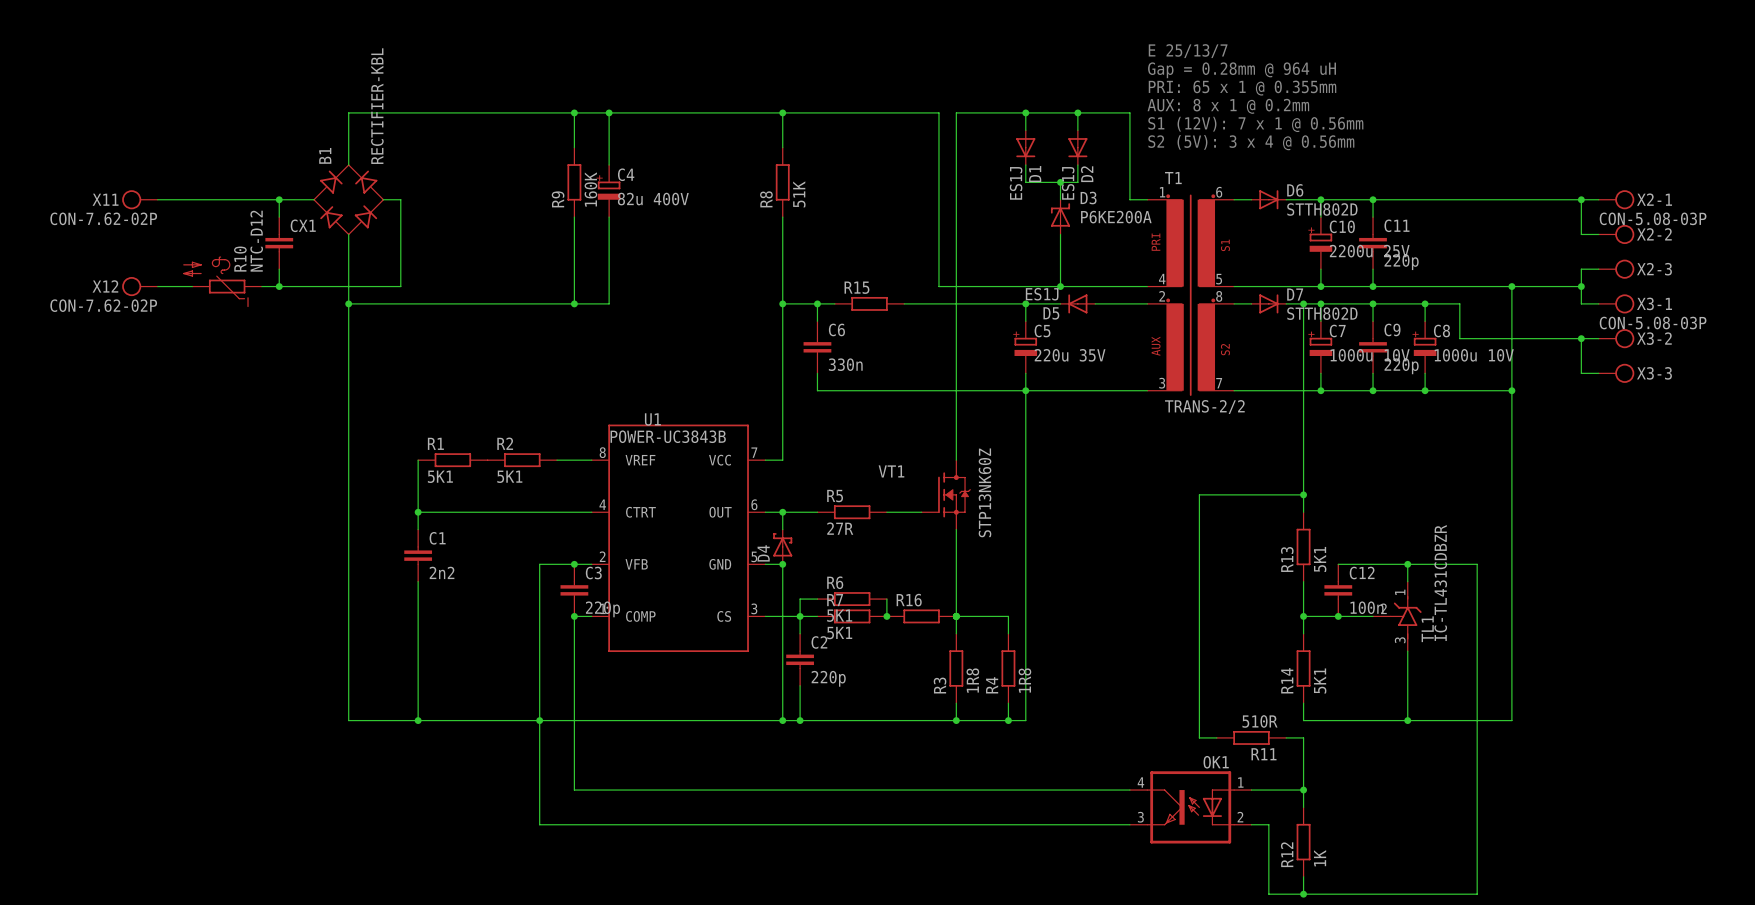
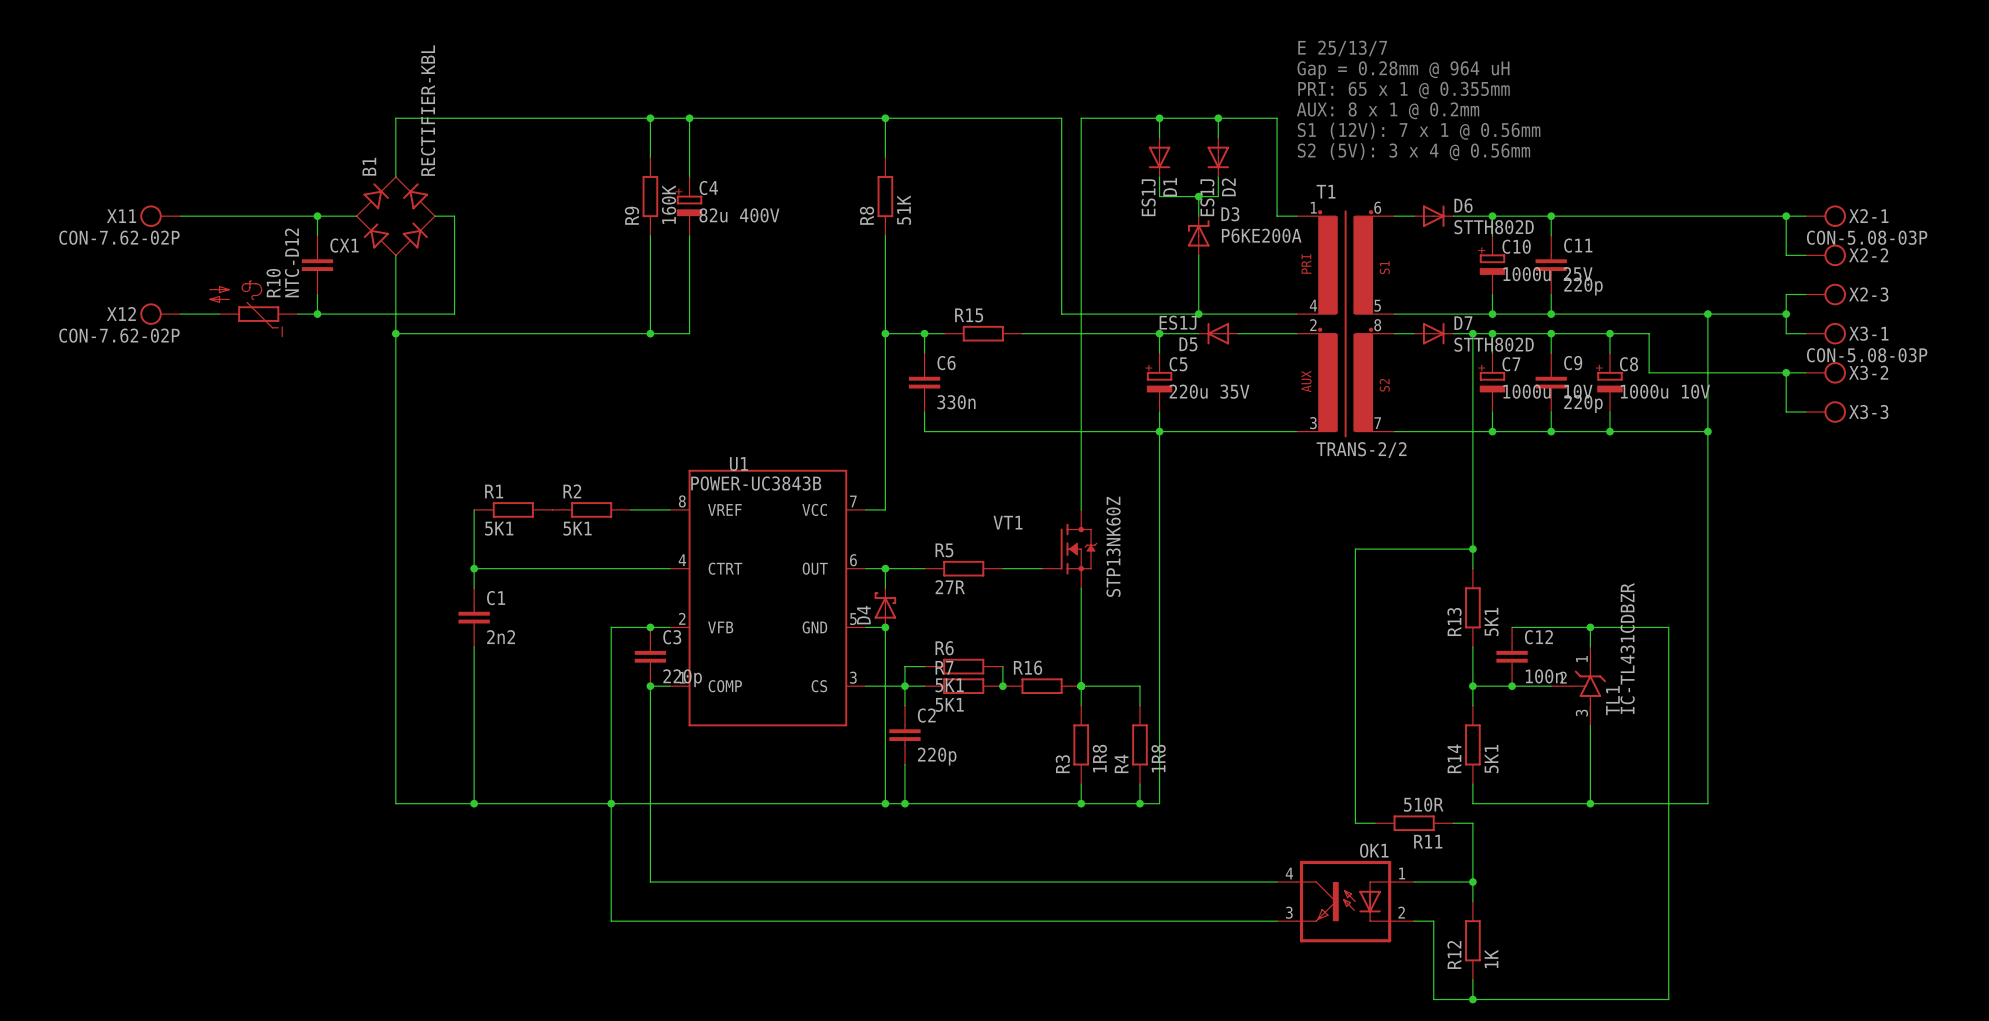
C10 value: 2200u 25V (1369, 251) -> 1000u 25V (1547, 274)

